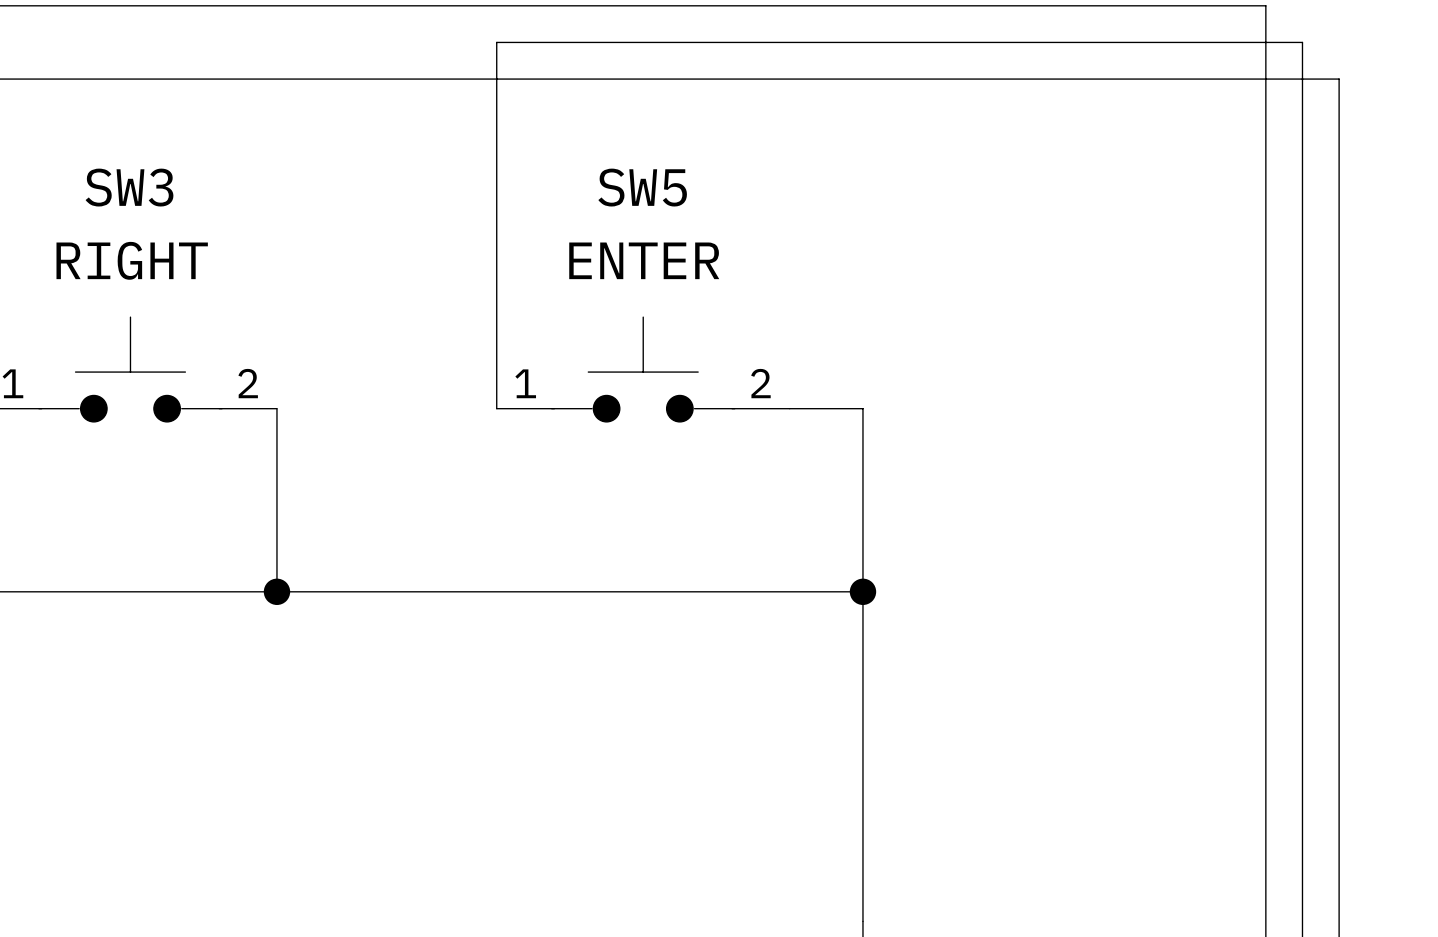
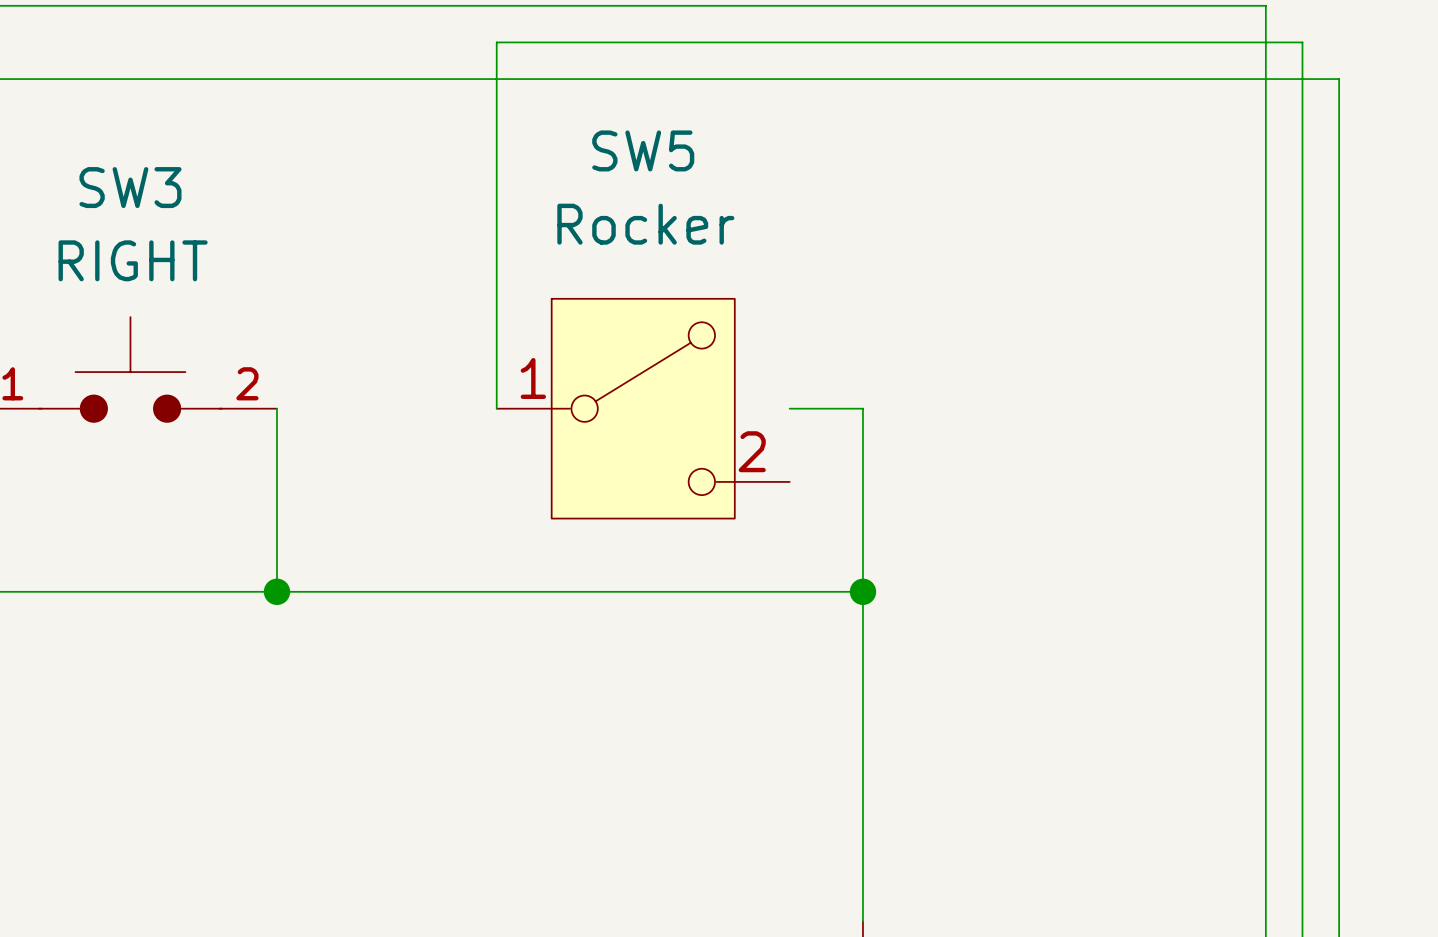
SW5 name position: SW5 (642, 187) -> SW5 (643, 150)
SW5 value: ENTER (644, 260) -> Rocker (645, 224)
SW5 symbol: [496, 317, 790, 422] -> [496, 298, 790, 519]

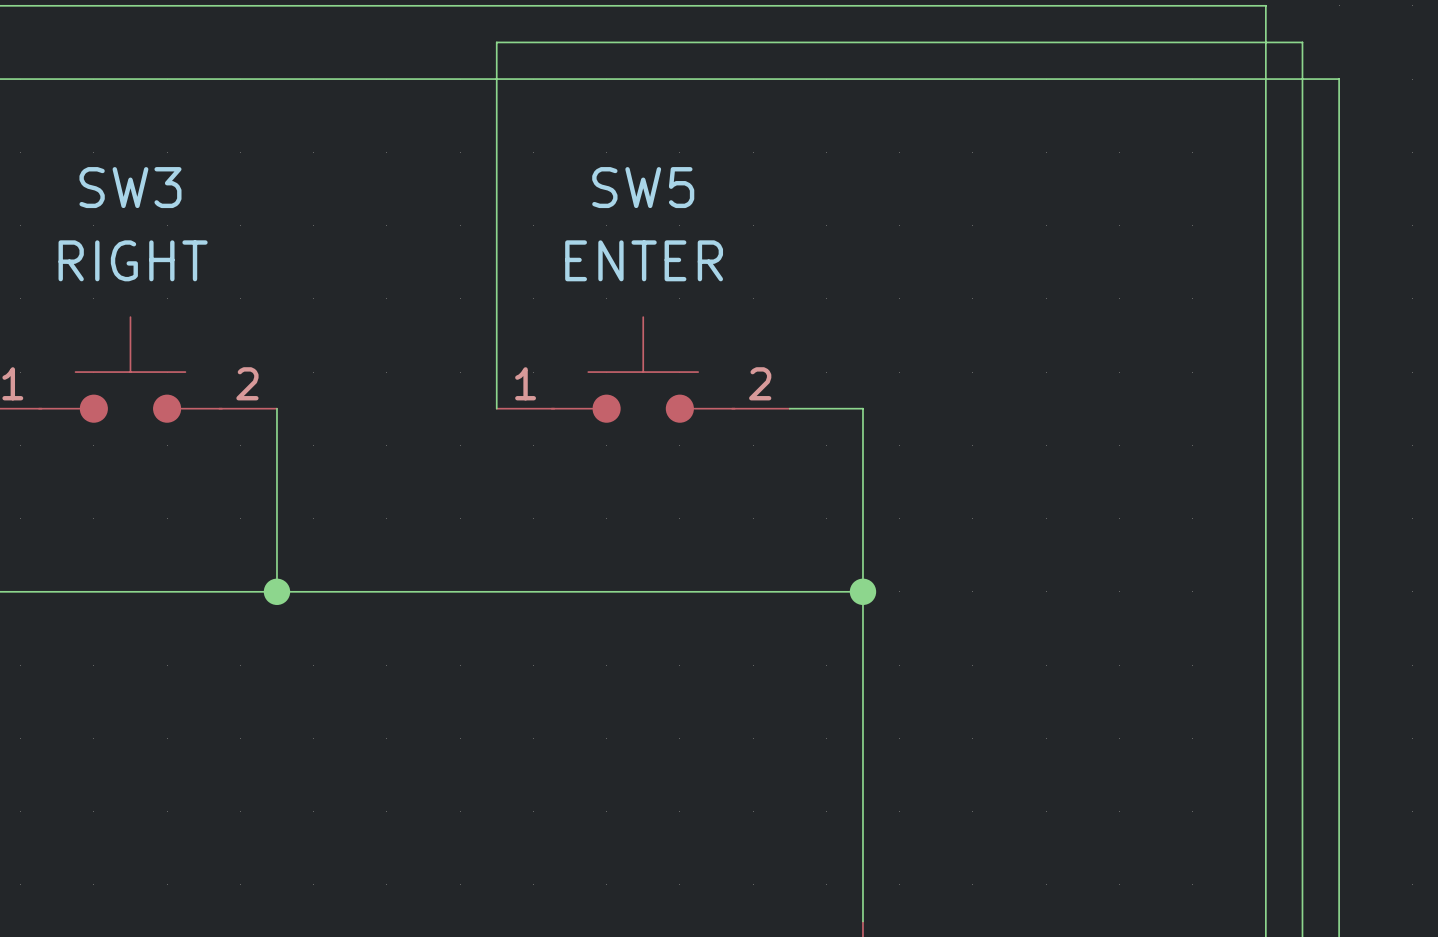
SW5 name position: SW5 (643, 150) -> SW5 (643, 187)
SW5 value: Rocker (645, 224) -> ENTER (644, 260)
SW5 symbol: [496, 298, 790, 519] -> [496, 317, 790, 422]

